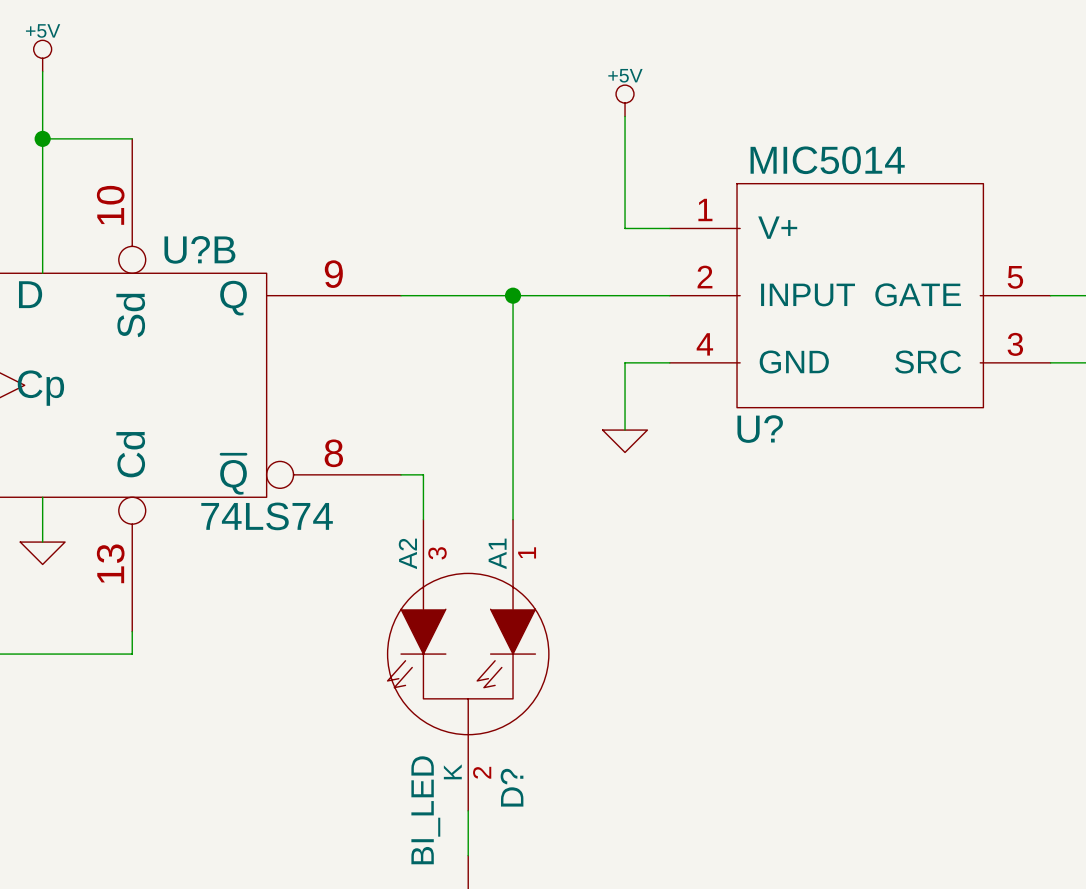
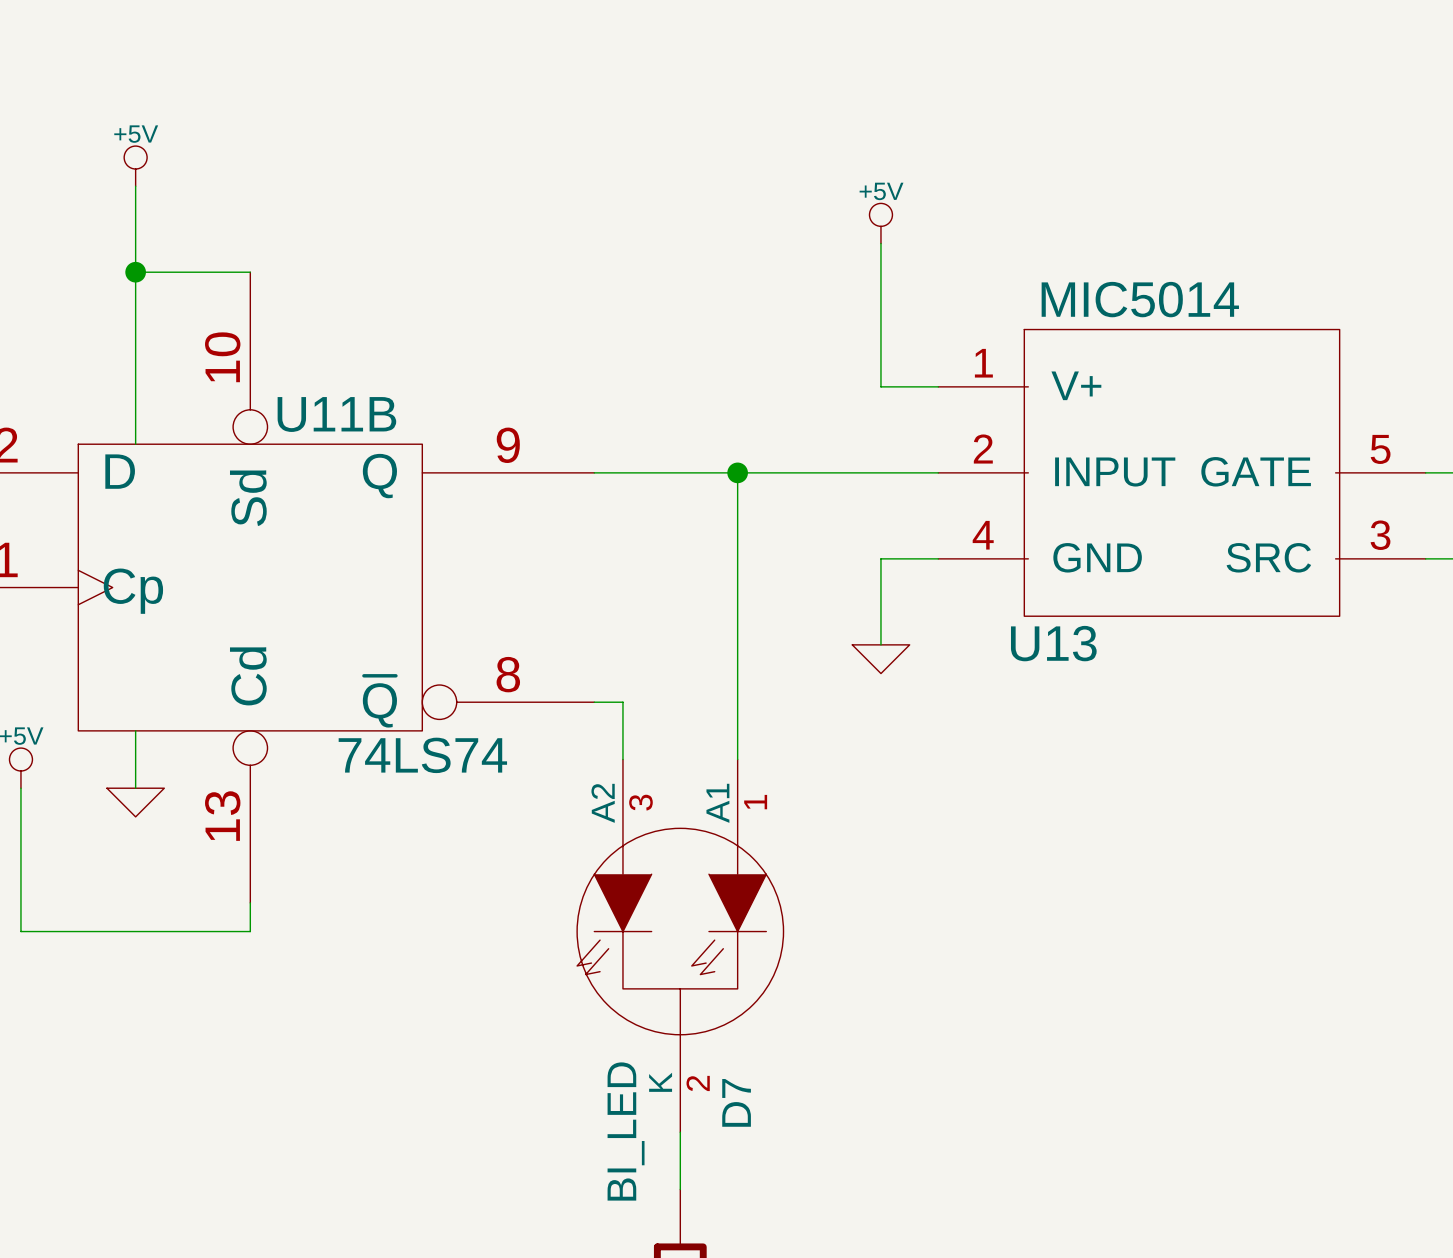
U?B name: U?B (199, 249) -> U11B (336, 414)
U? name: U? (760, 429) -> U13 (1053, 643)
D? name: D? (512, 787) -> D7 (736, 1102)

